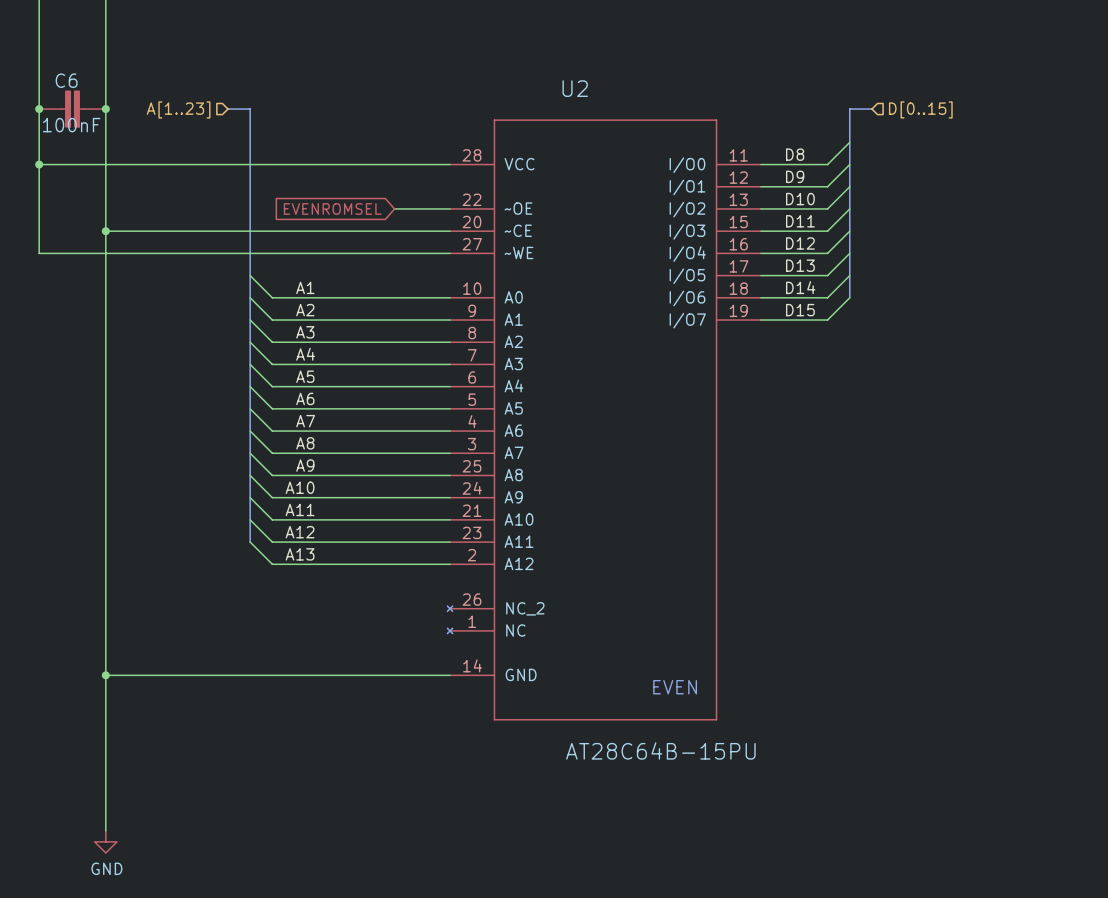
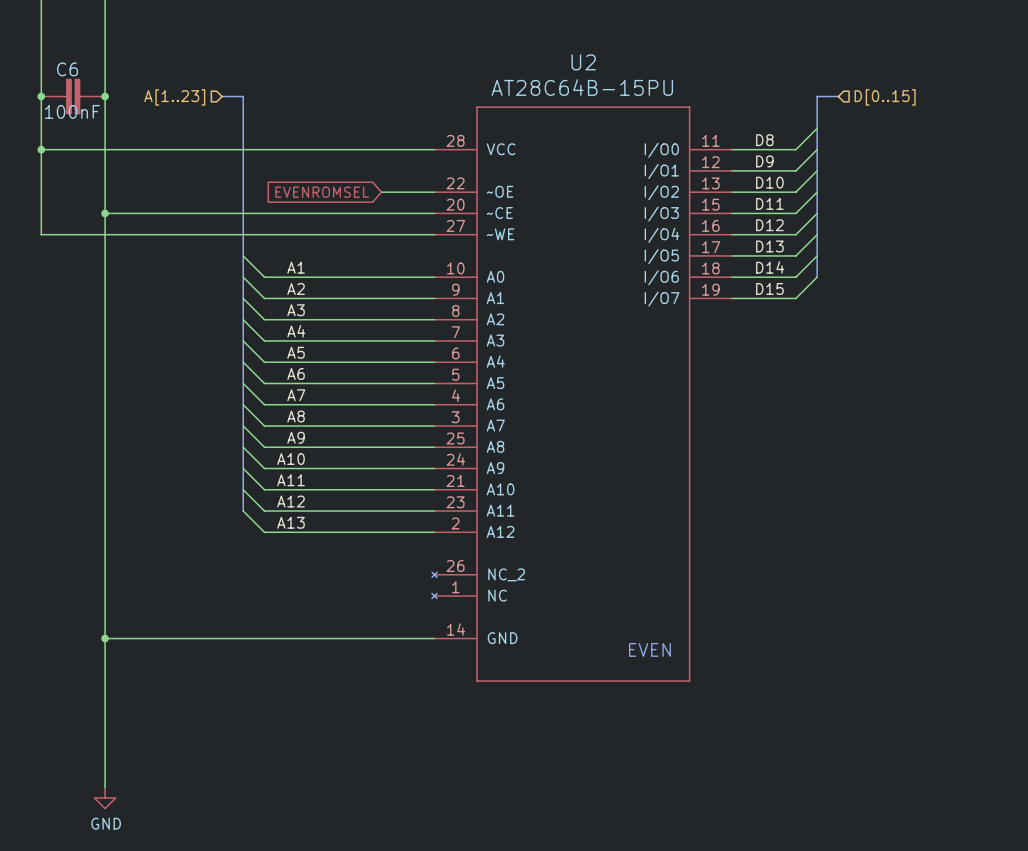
U2 name position: U2 (575, 88) -> U2 (583, 62)
U2 value position: AT28C64B-15PU (660, 750) -> AT28C64B-15PU (582, 87)

